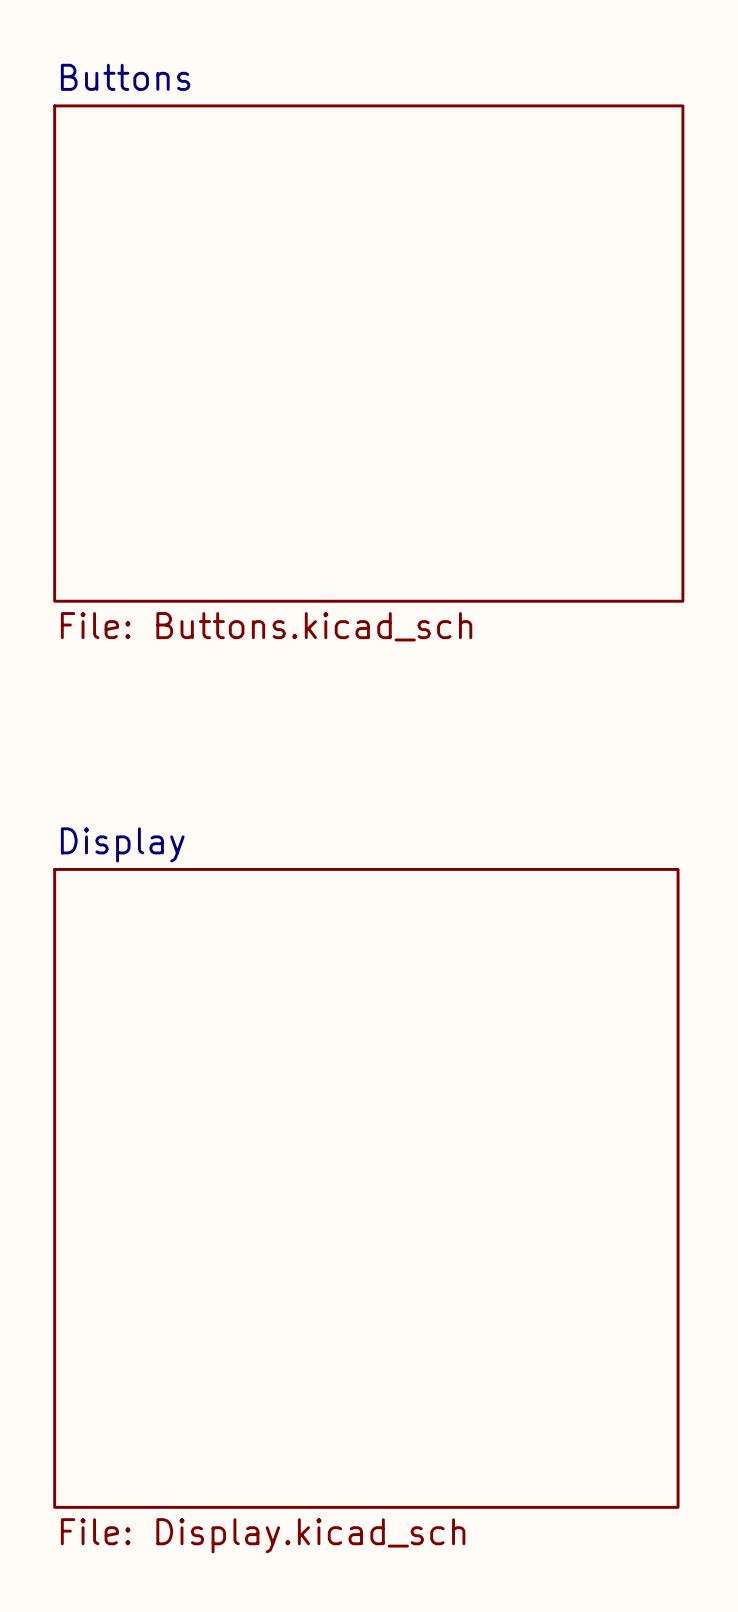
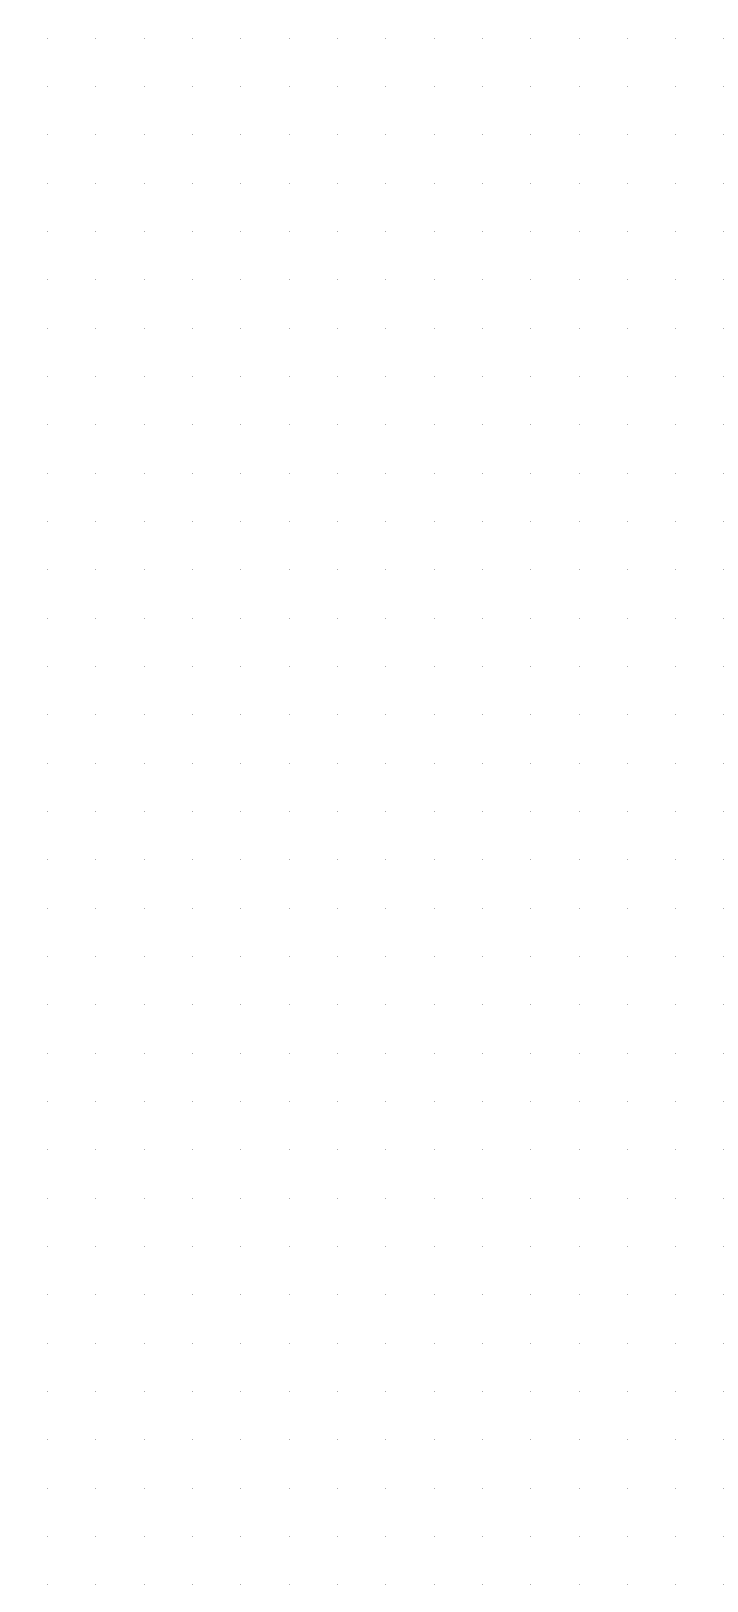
sheet Buttons: File: Buttons.kicad_sch (368, 353) -> none
sheet Display: File: Display.kicad_sch (366, 1188) -> none

